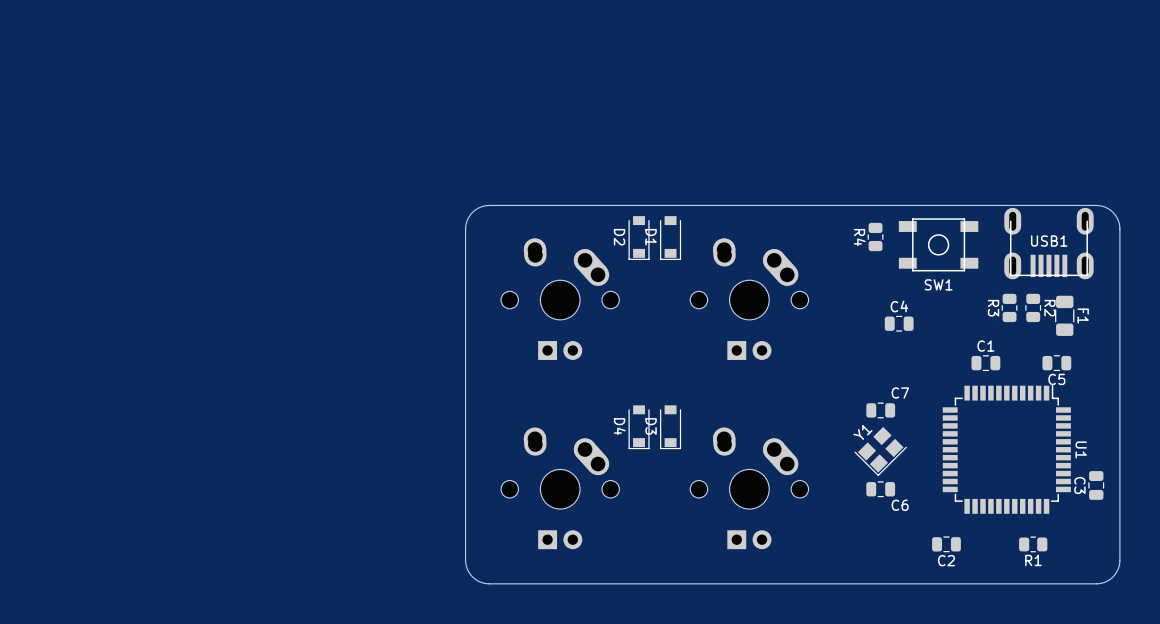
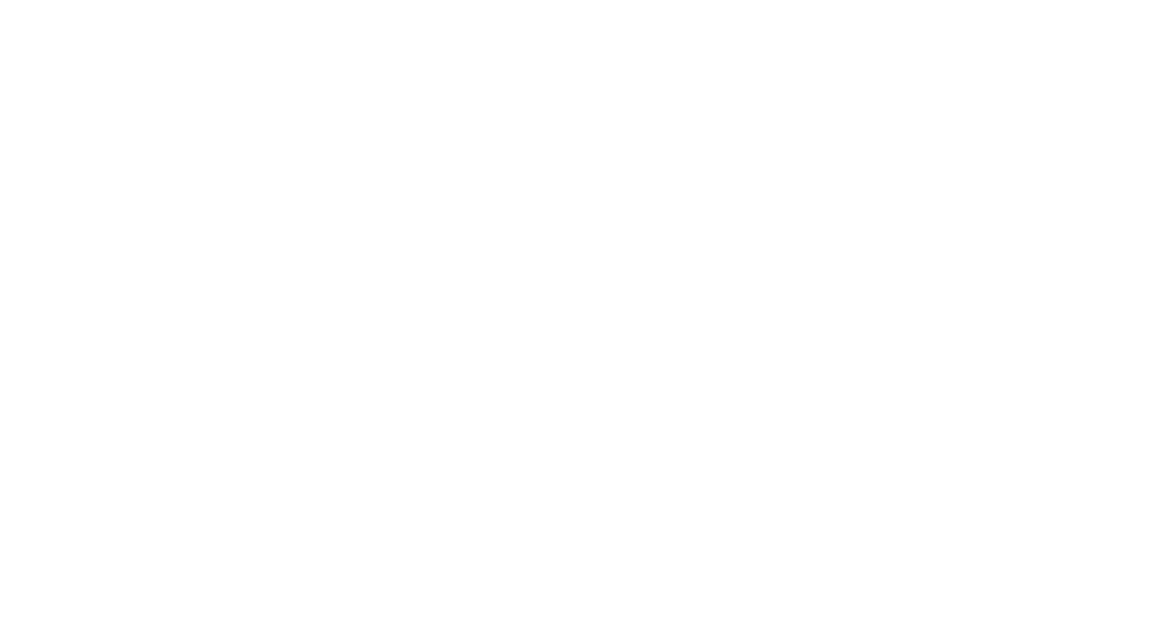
board edge: (1096, 205) (489, 205) (477, 208) (468, 217) (465, 229) (465, 560) (468, 572) (477, 580) (489, 583) (1096, 583) (1108, 580) (1116, 572) (1119, 560) (1119, 229) (1118, 220) (1112, 212) (1105, 207) (1096, 205) -> none
R4: (875, 236) -> none
D2: (639, 238) -> none
D1: (670, 238) -> none
USB1: (1048, 243) -> none
SW1: (938, 244) -> none
part: (560, 299) -> none
part: (749, 299) -> none
R3: (1009, 307) -> none
R2: (1033, 307) -> none
F1: (1064, 315) -> none
C4: (899, 323) -> none
C1: (985, 363) -> none
C5: (1056, 363) -> none
C7: (880, 410) -> none
D4: (639, 427) -> none
D3: (670, 427) -> none
U1: (1006, 449) -> none
Y1: (880, 451) -> none
C3: (1096, 485) -> none
part: (560, 488) -> none
part: (749, 488) -> none
C6: (880, 489) -> none
C2: (946, 544) -> none
R1: (1033, 544) -> none

